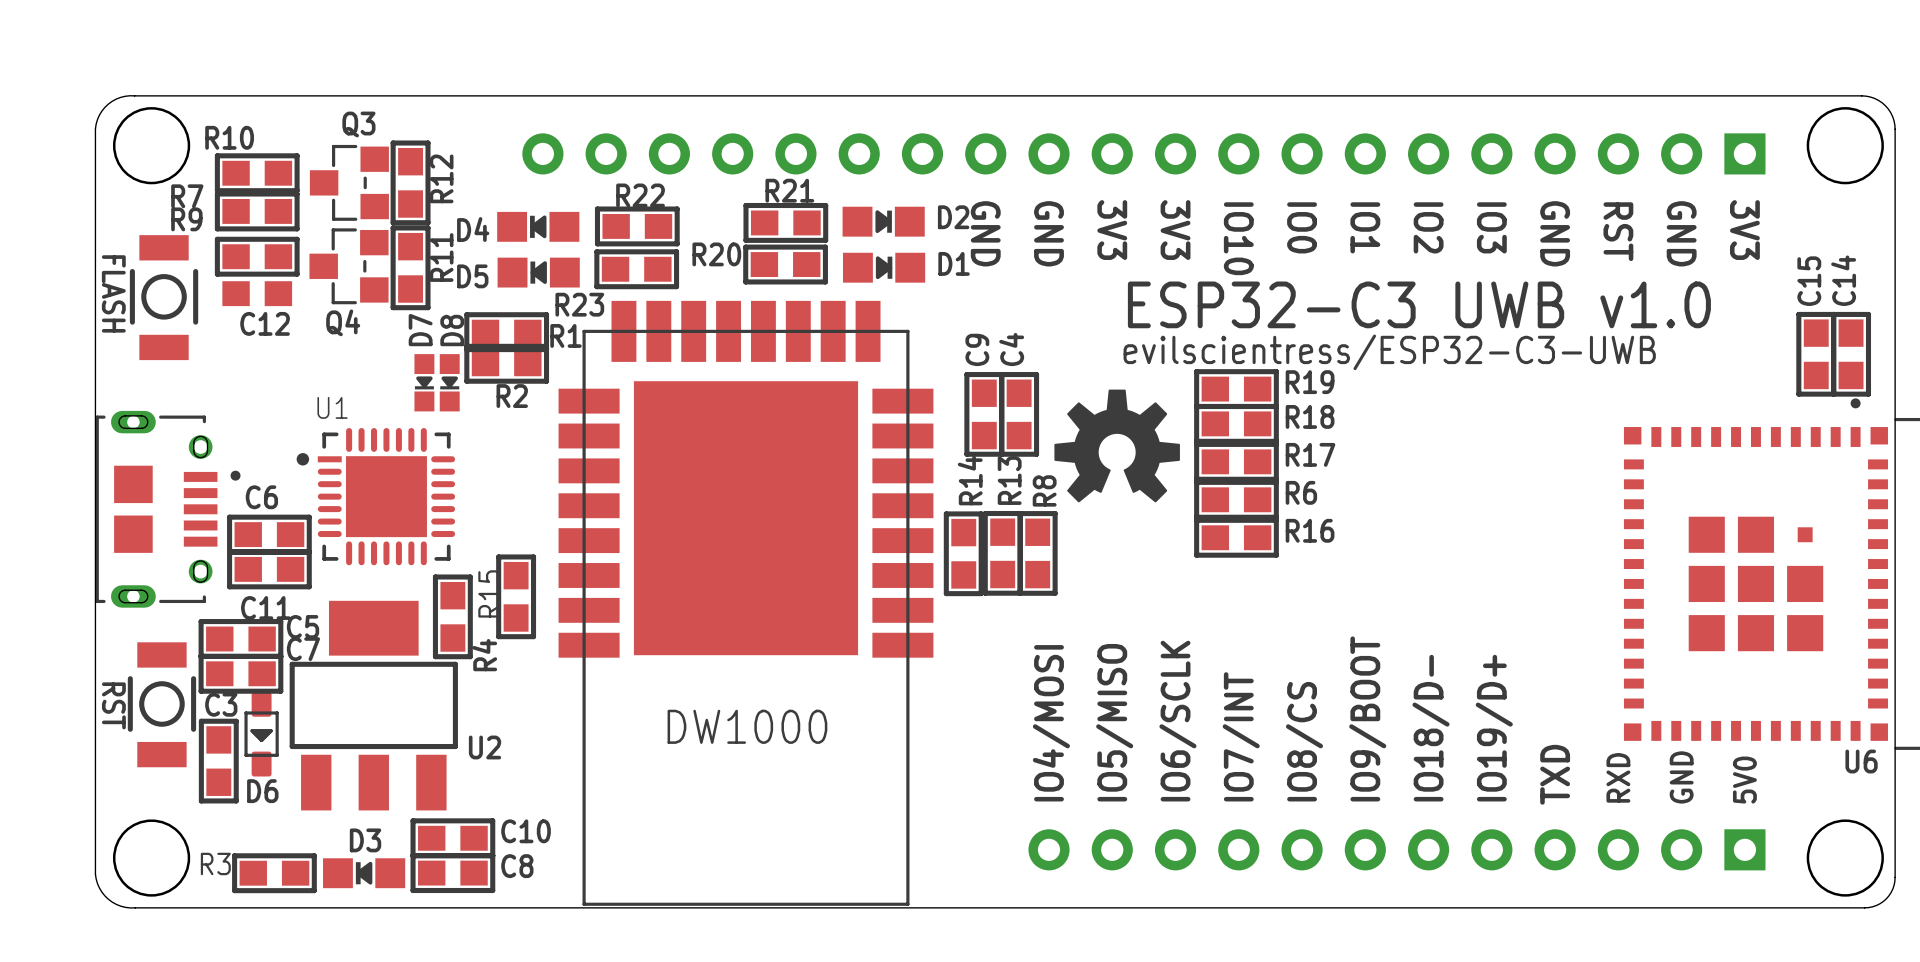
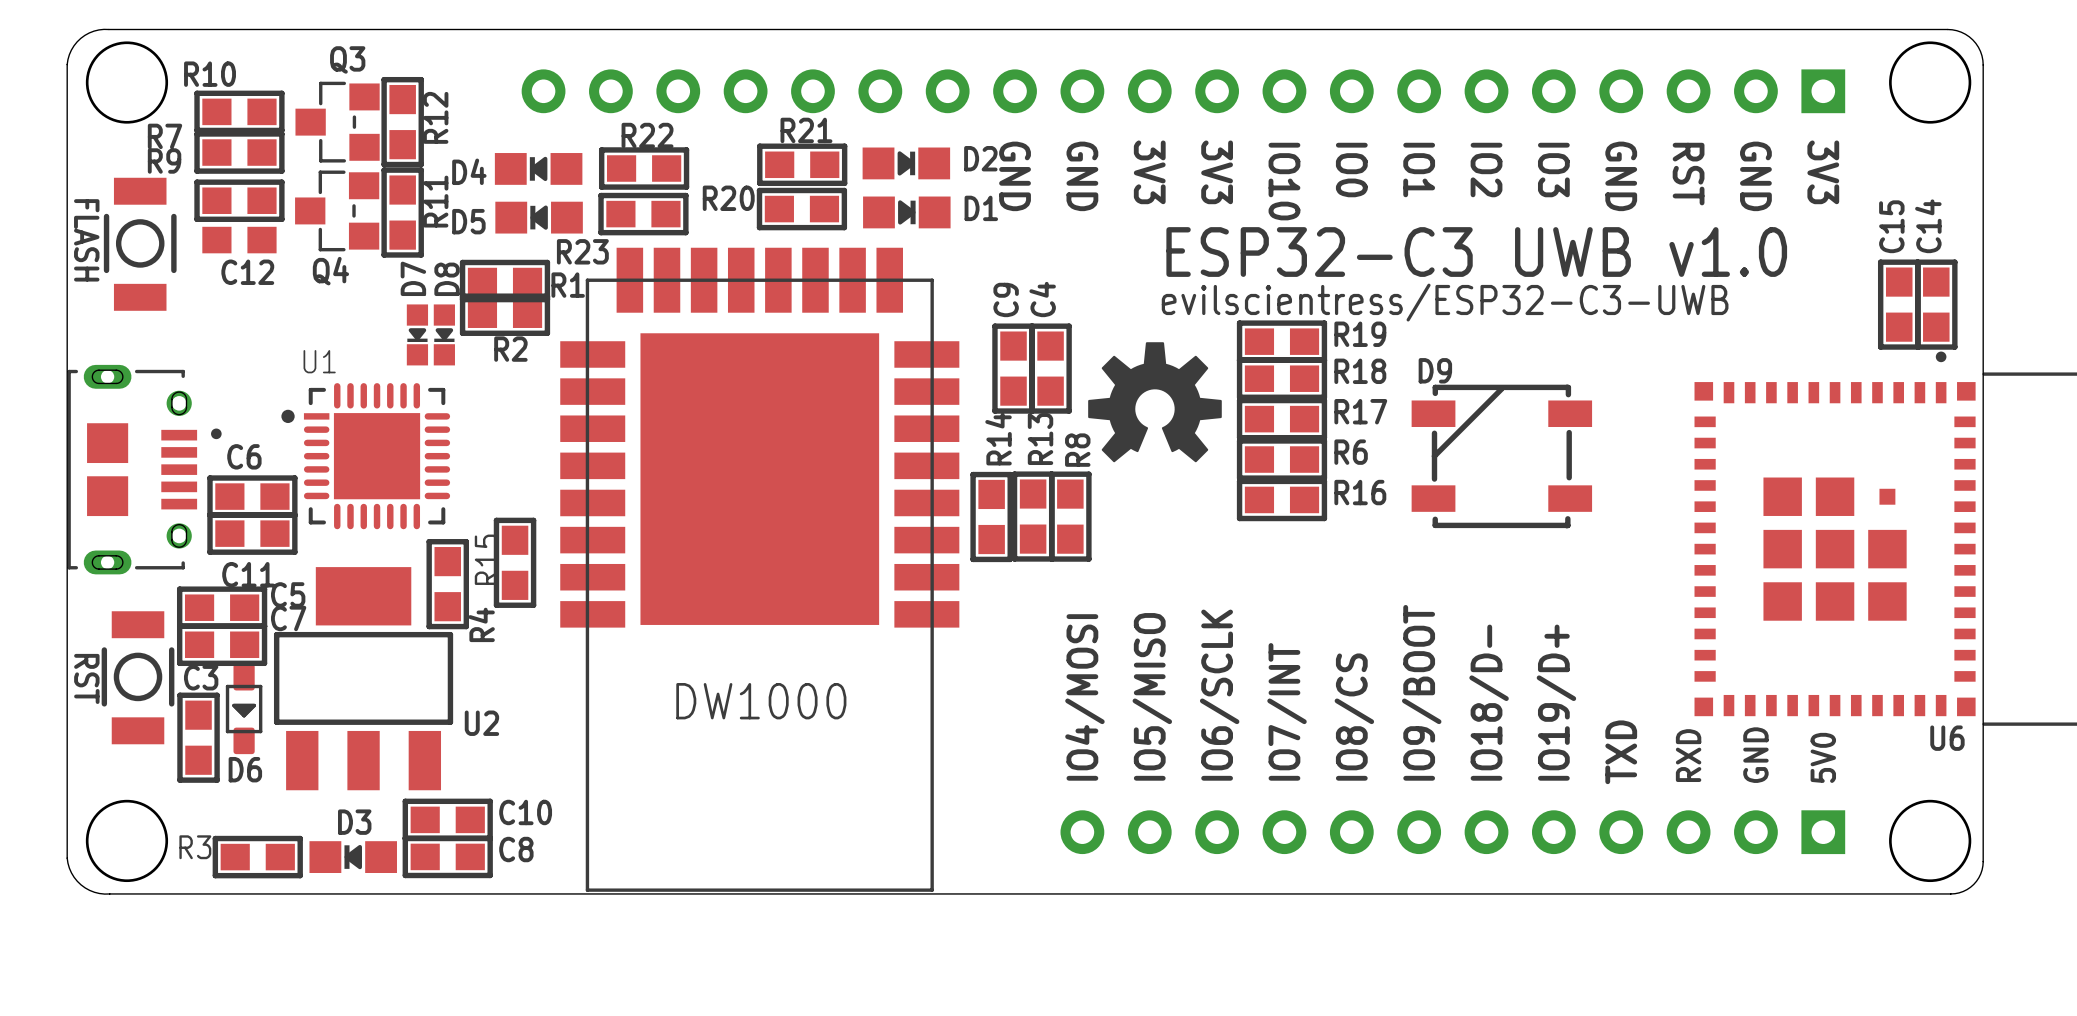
D9: none -> (1501, 456)

